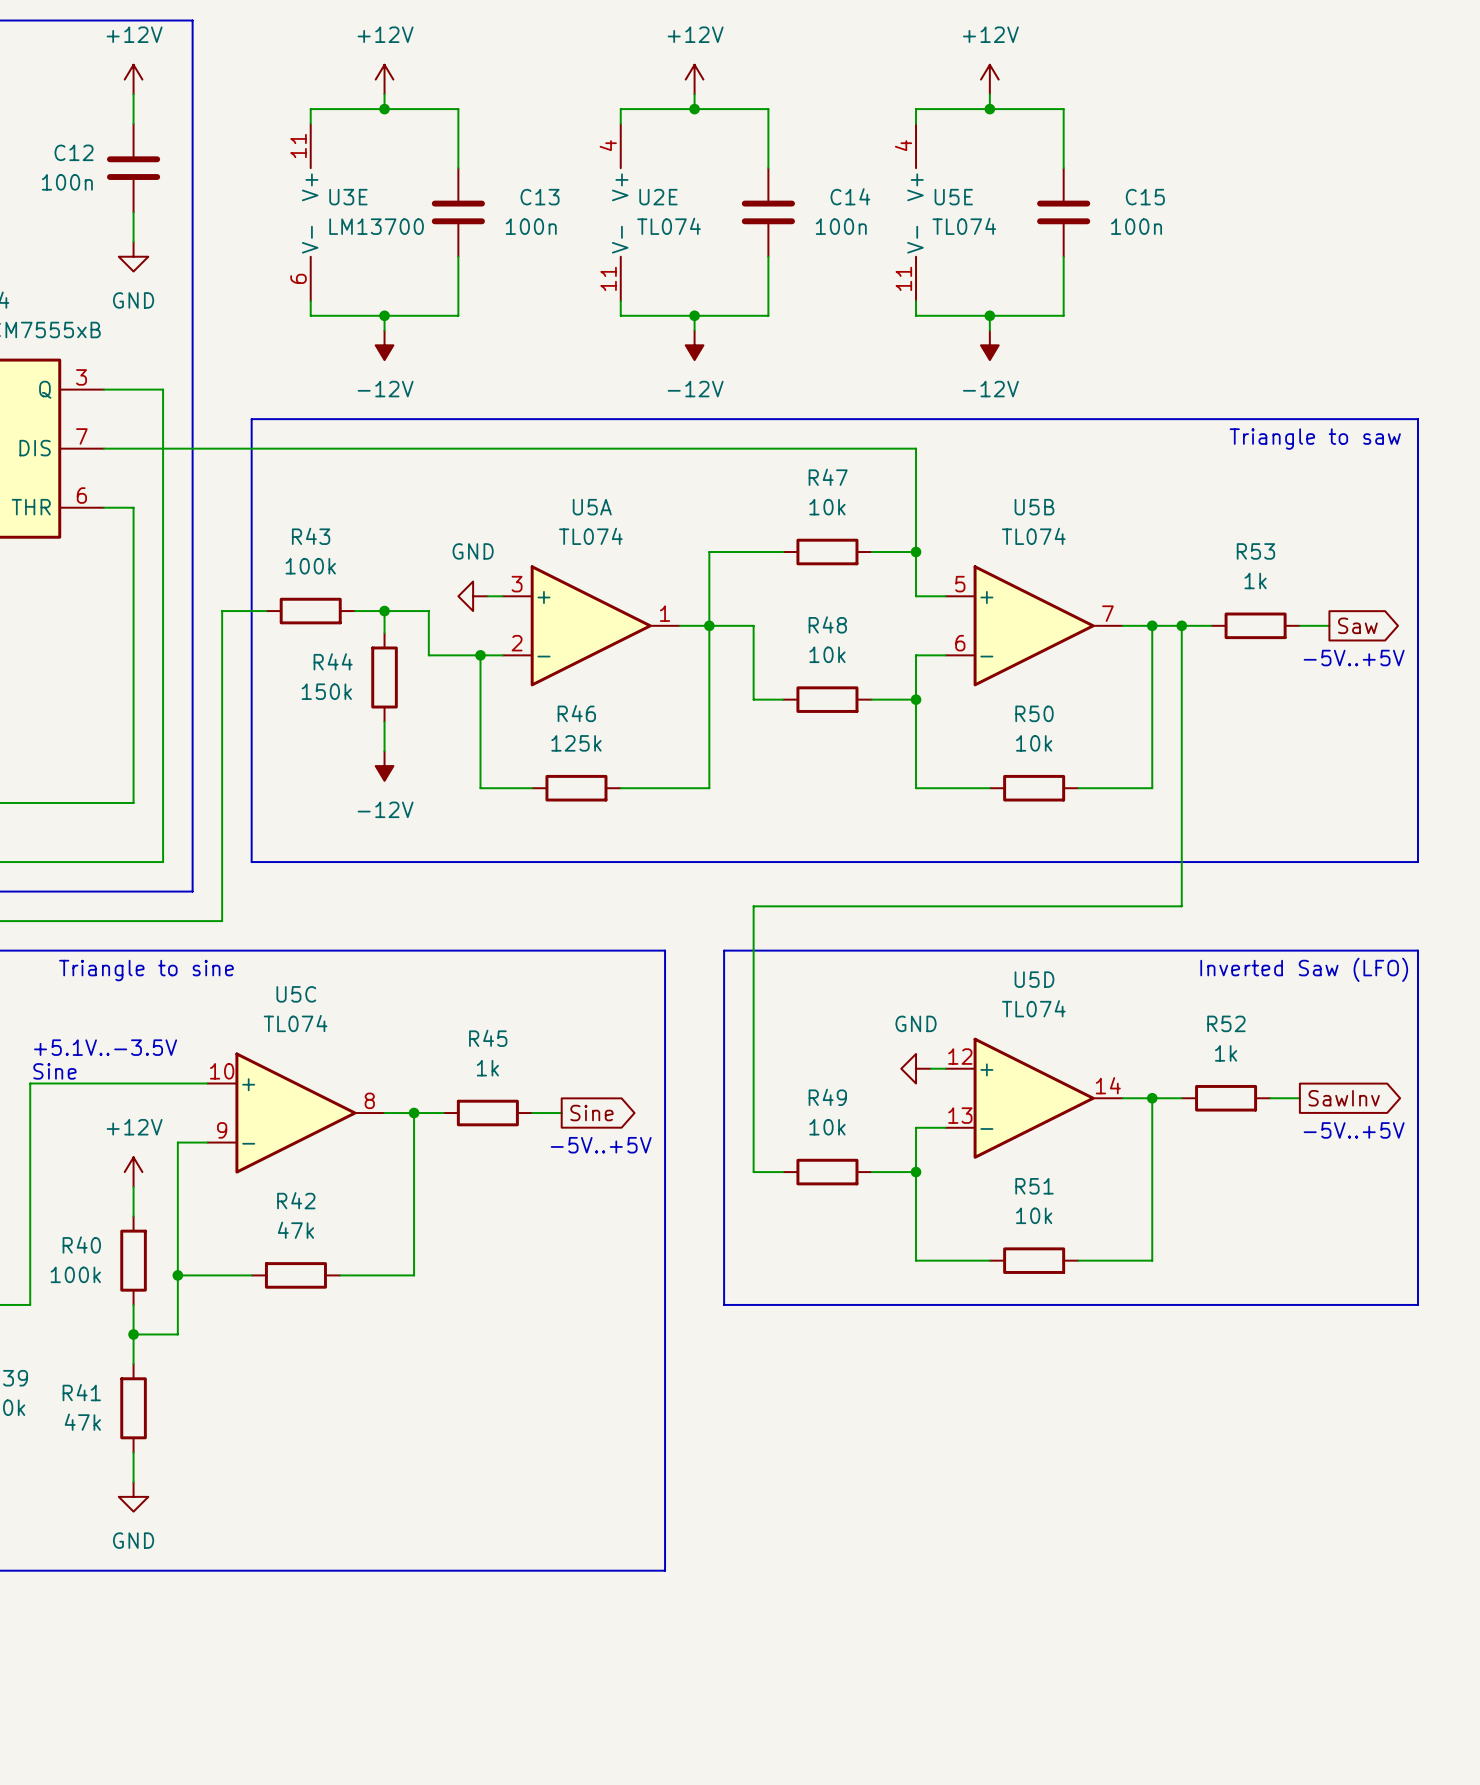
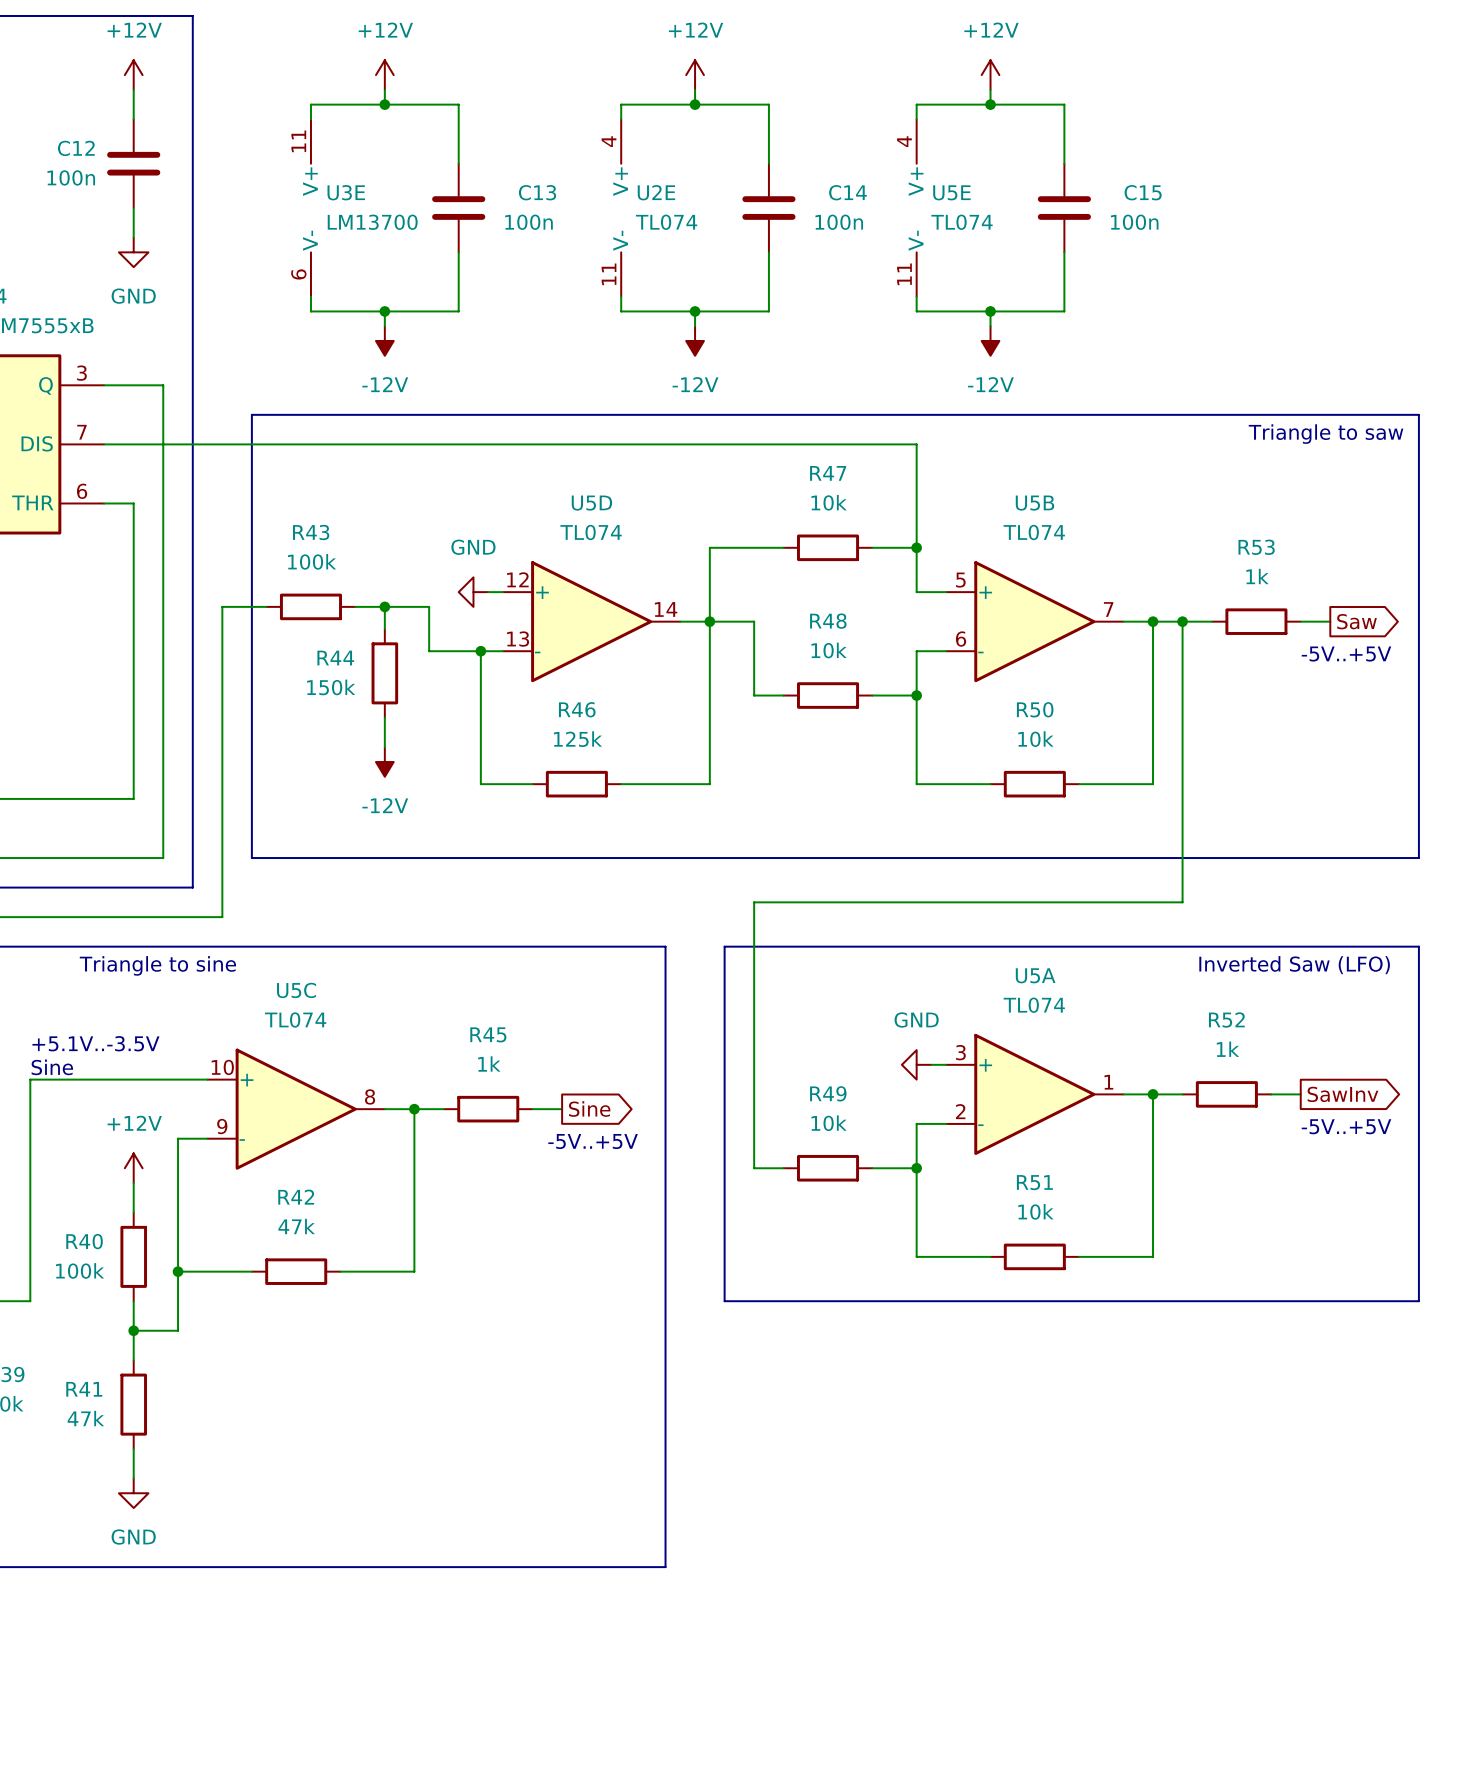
U5A position: (591, 625) -> (1034, 1094)
U5D position: (1034, 1098) -> (591, 621)

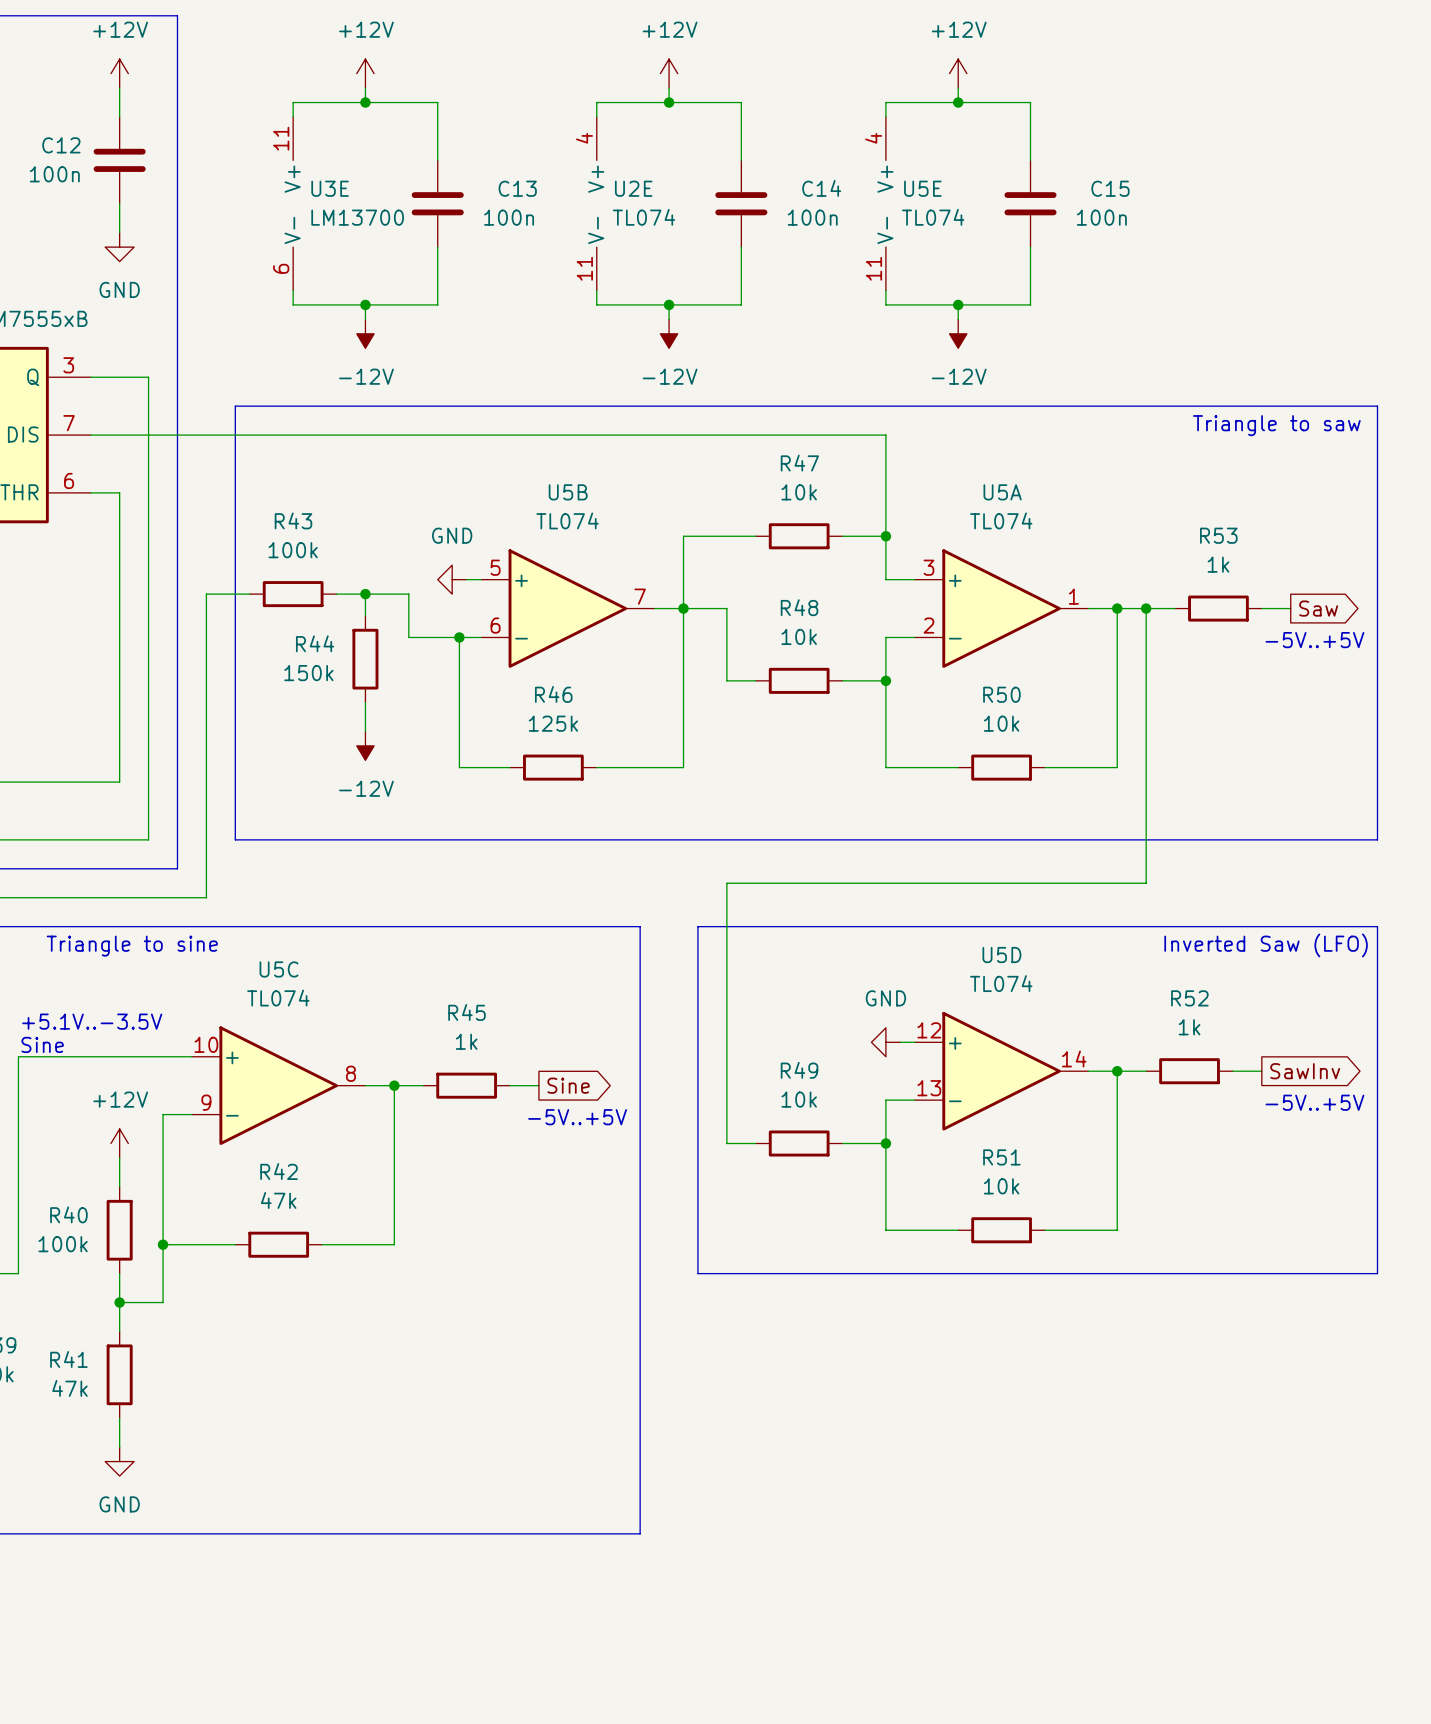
U5D position: (591, 621) -> (1001, 1071)
U5B position: (1034, 621) -> (567, 608)
U5A position: (1034, 1094) -> (1001, 608)

